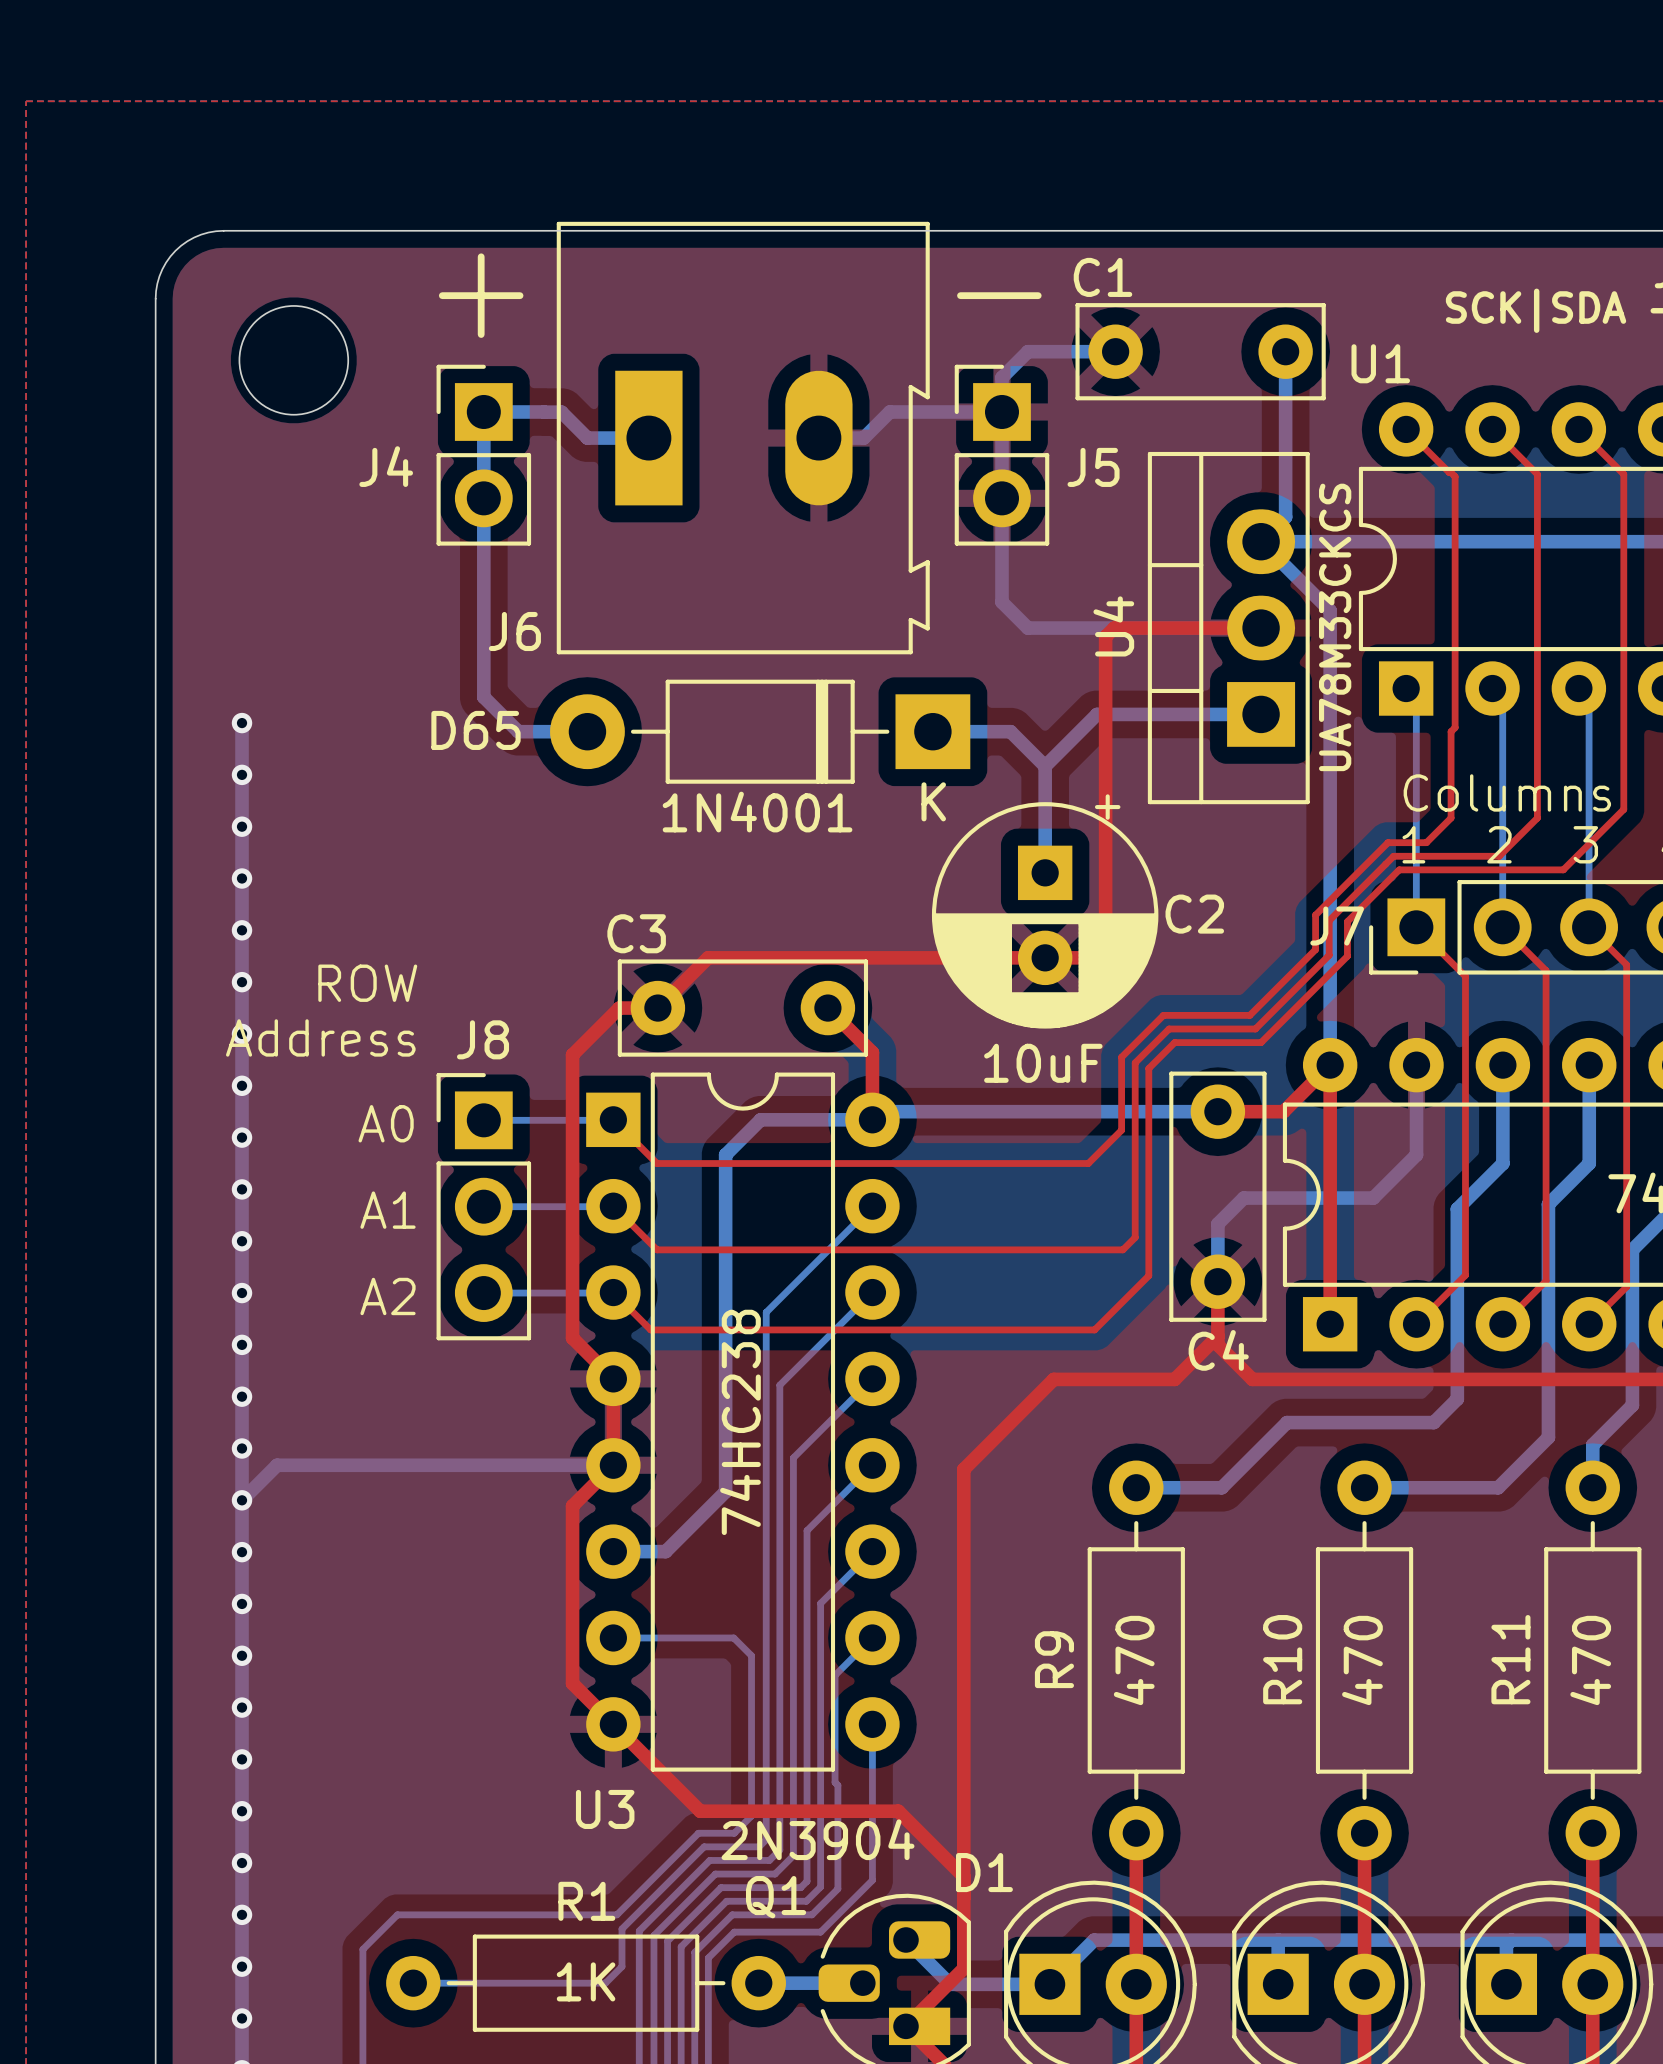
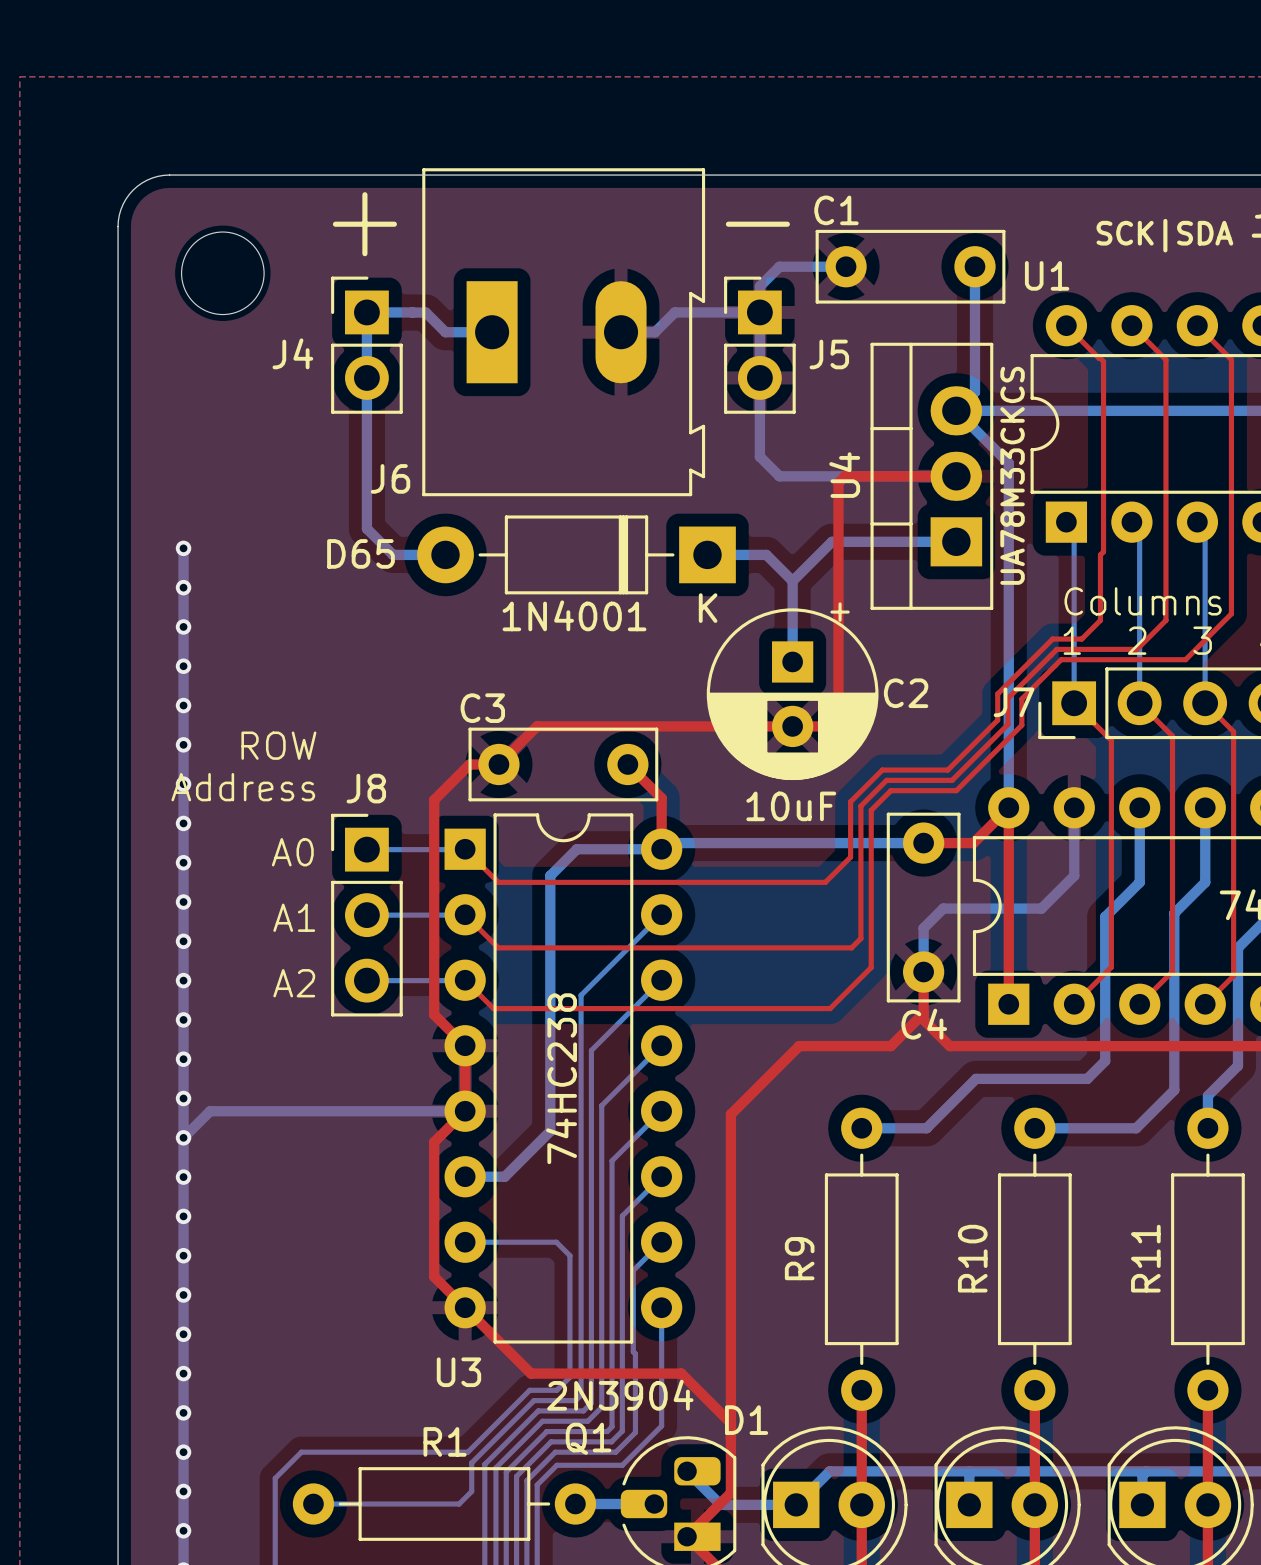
R9 value: 470 (1134, 1660) -> none
R10 value: 470 (1362, 1660) -> none
R11 value: 470 (1590, 1660) -> none
R1 value: 1K (586, 1981) -> none

